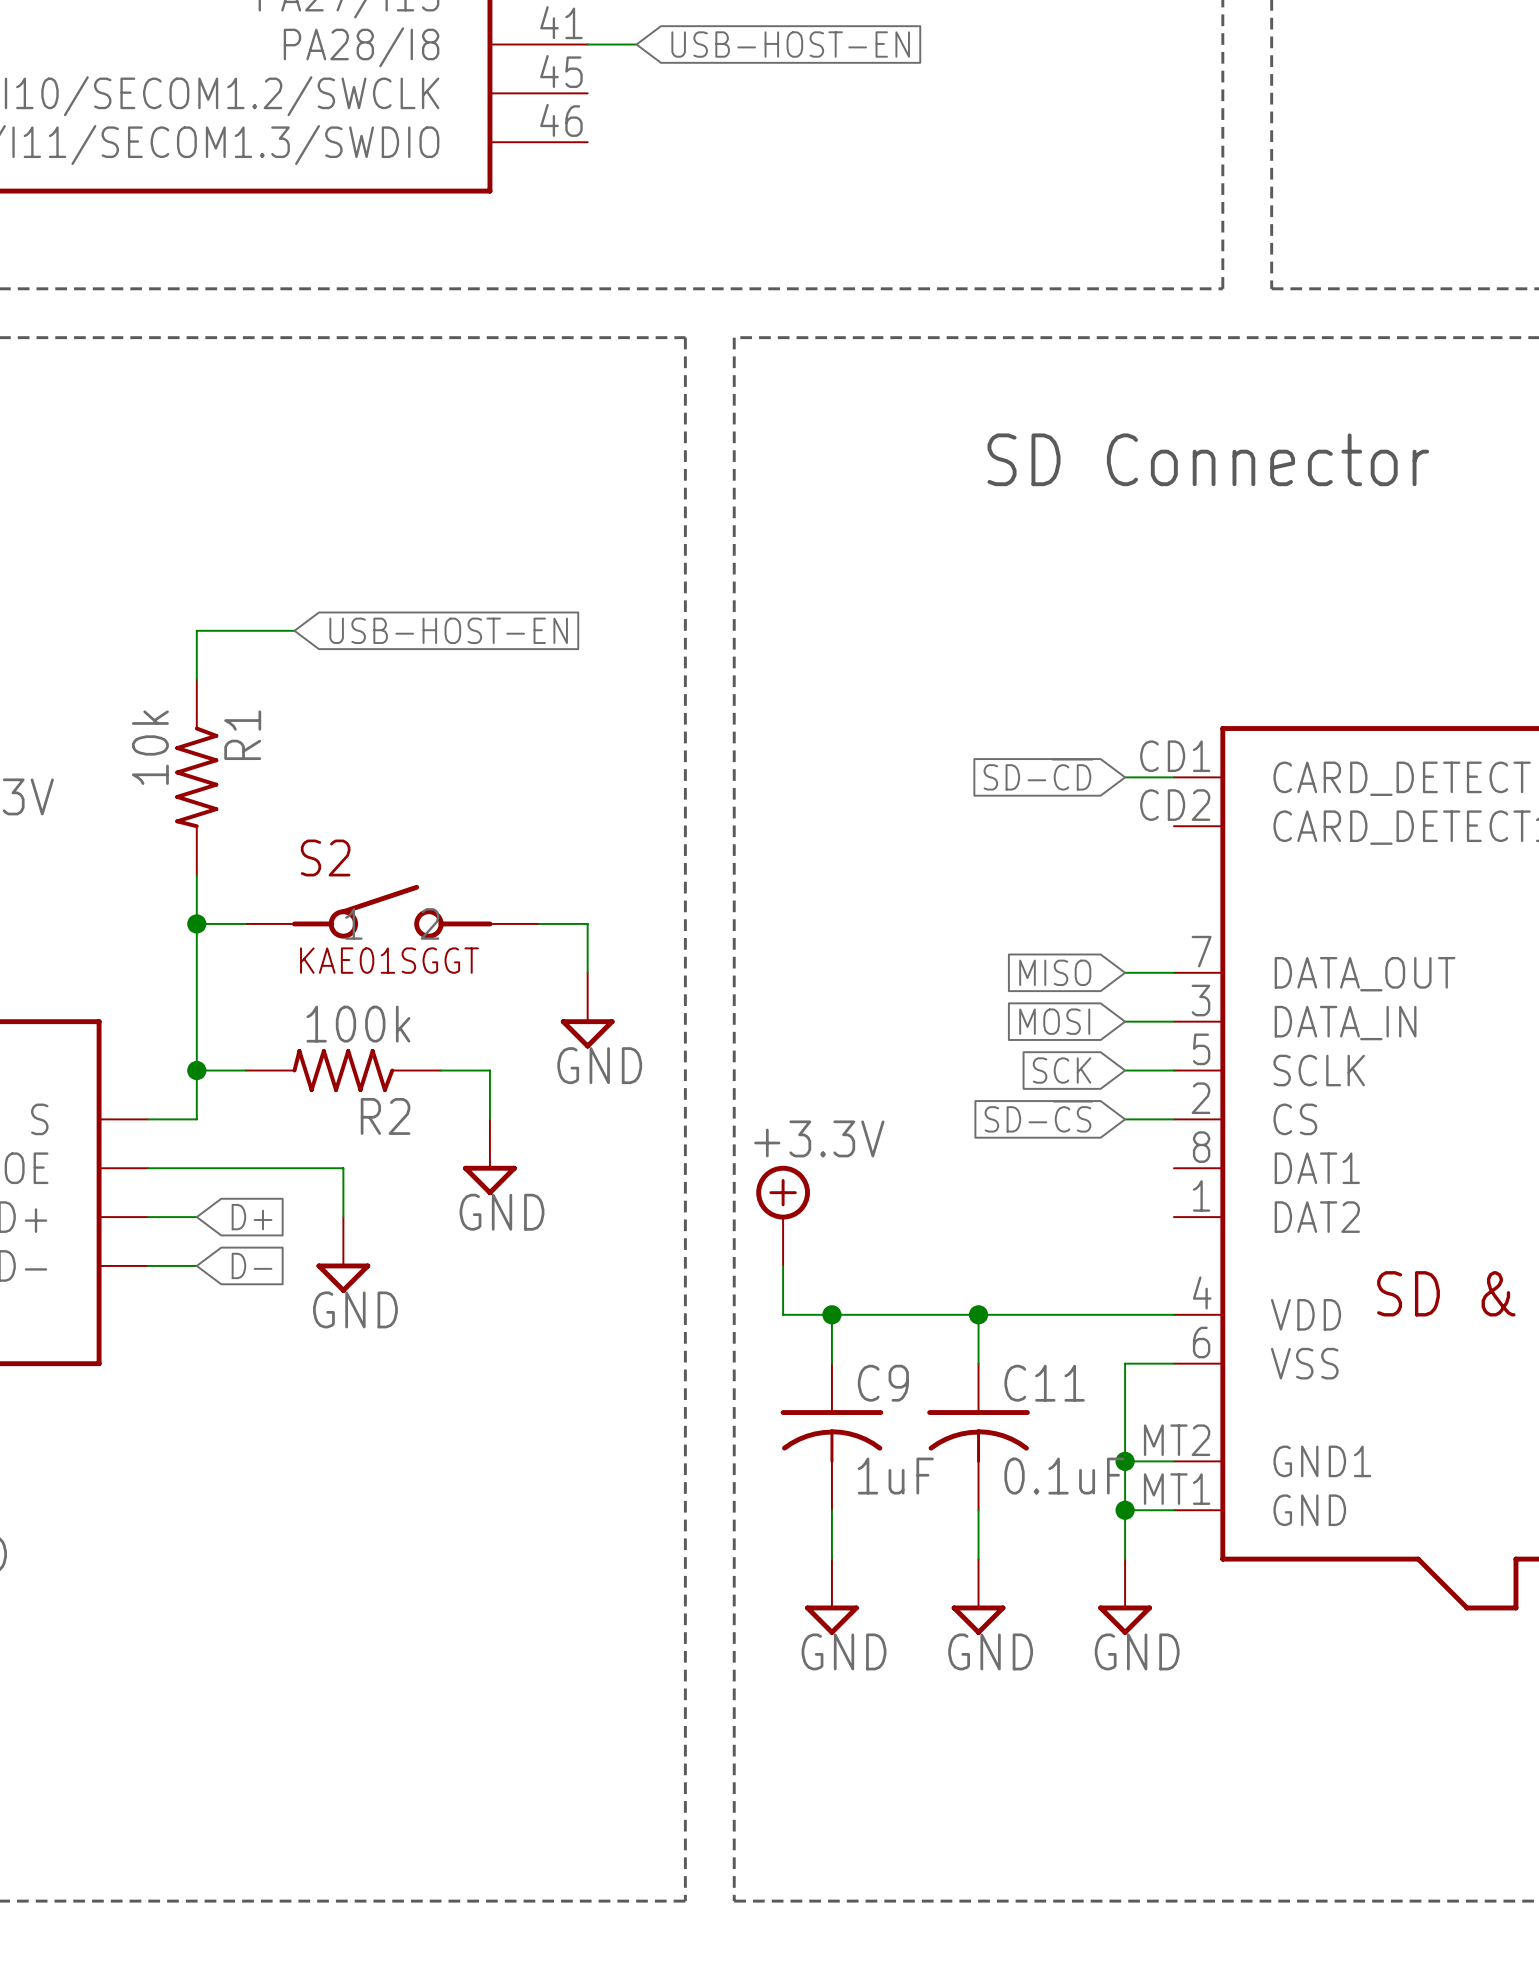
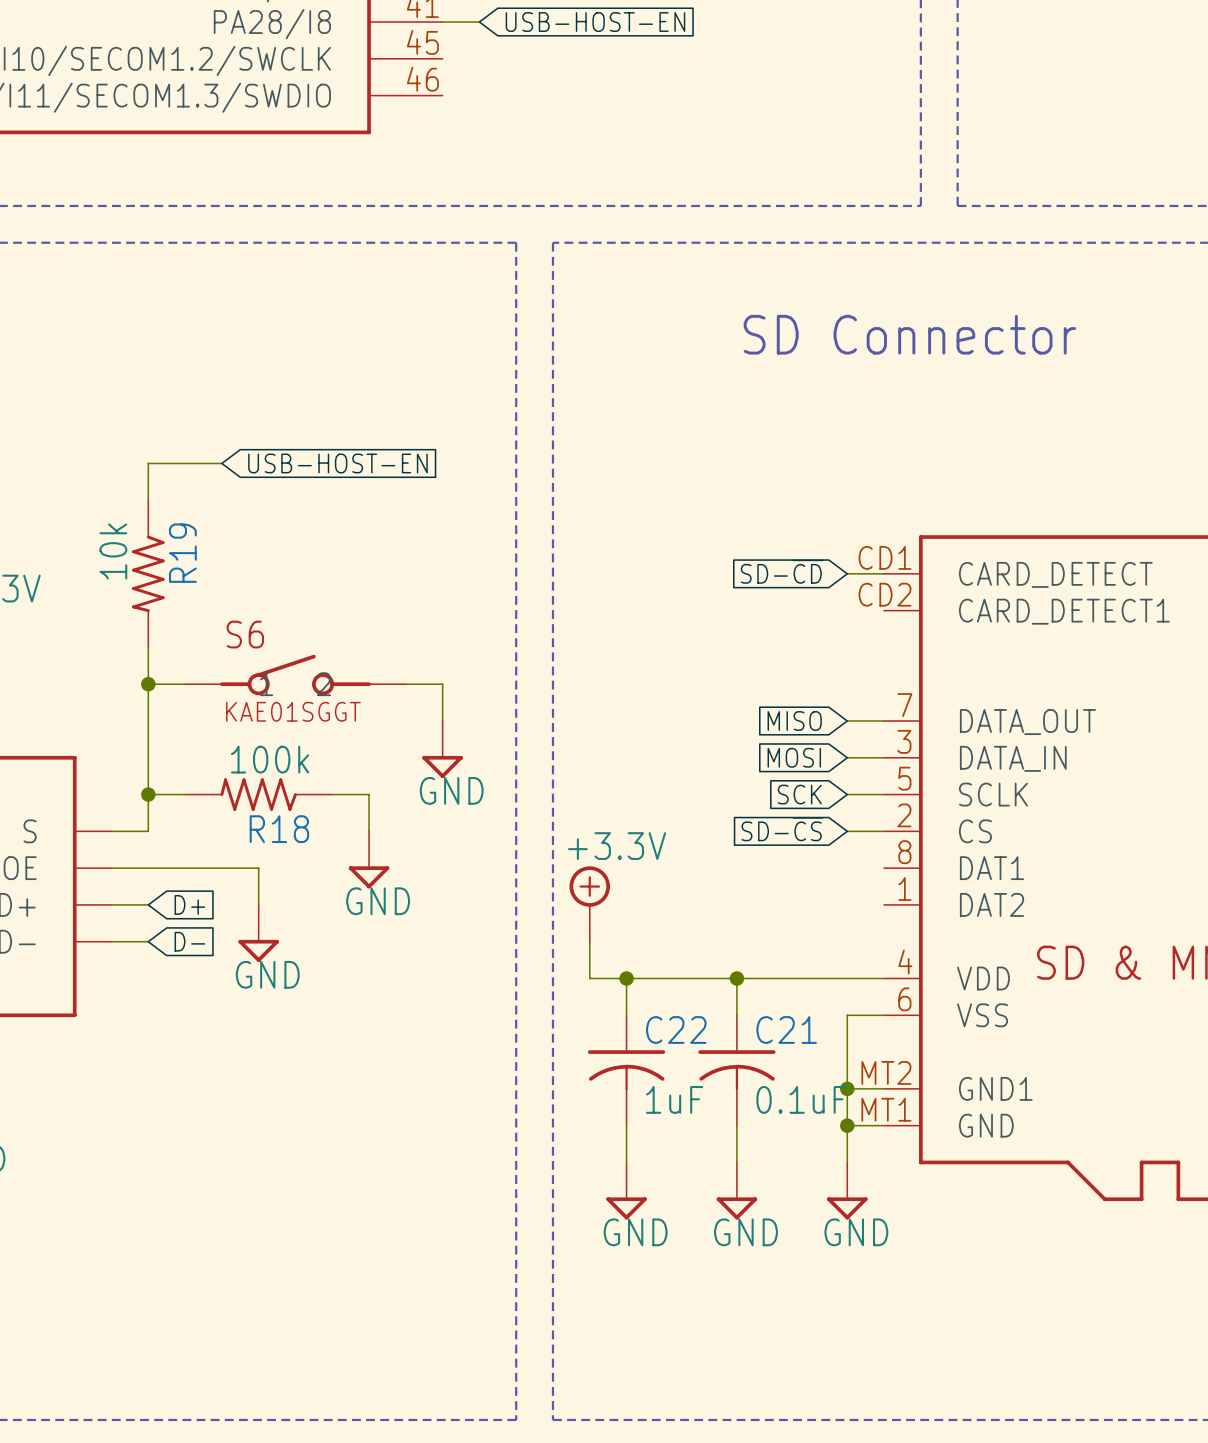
R1 name: R1 (242, 735) -> R19 (182, 553)
S2 name: S2 (325, 857) -> S6 (245, 634)
R2 name: R2 (385, 1116) -> R18 (279, 829)
C9 name: C9 (883, 1383) -> C22 (676, 1030)
C11 name: C11 (1044, 1383) -> C21 (786, 1030)

